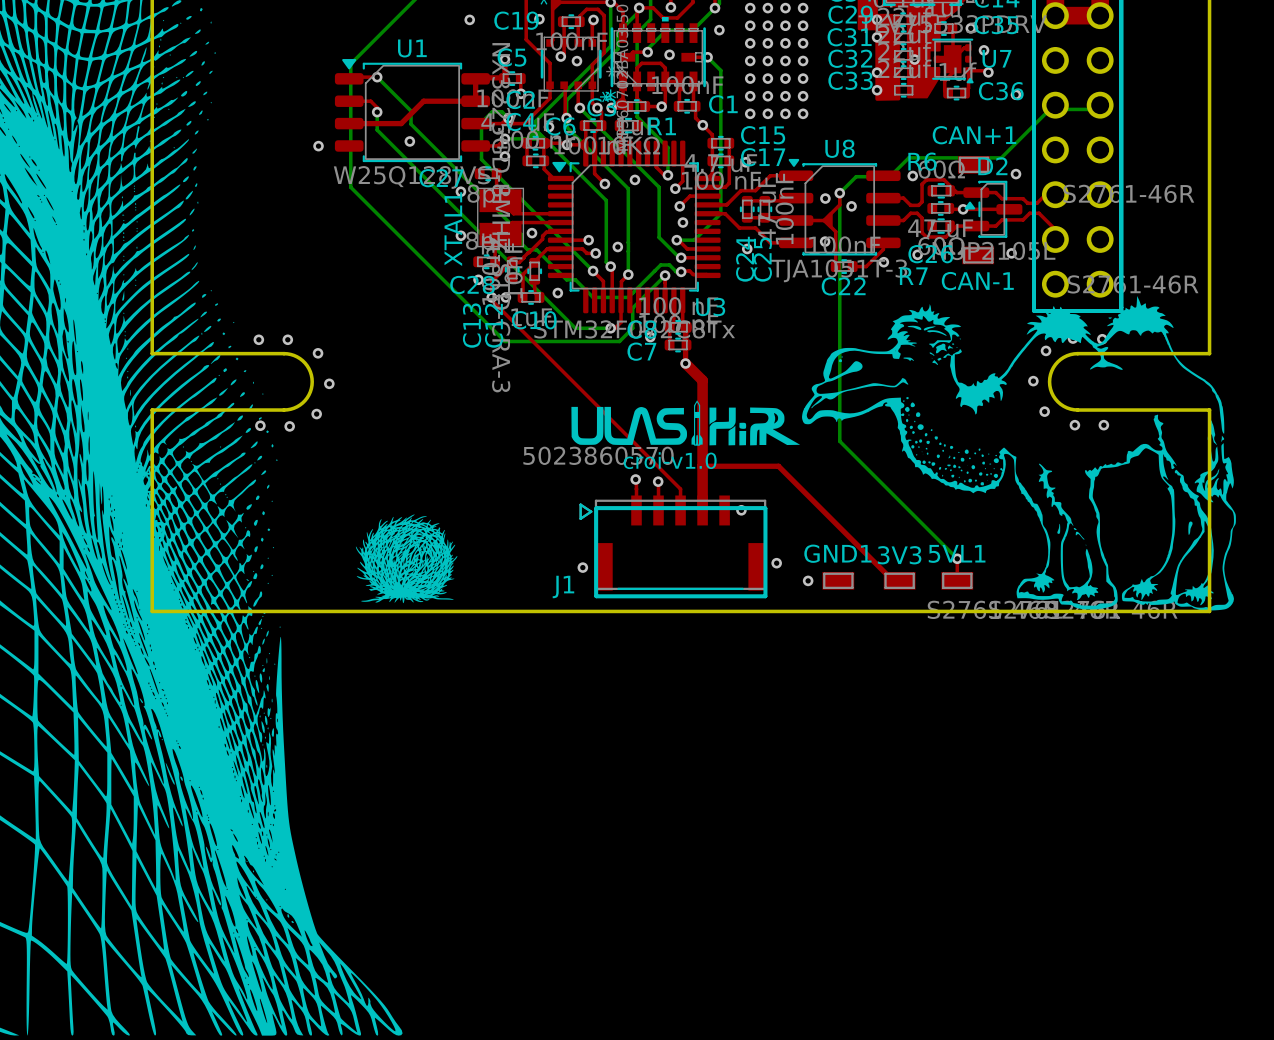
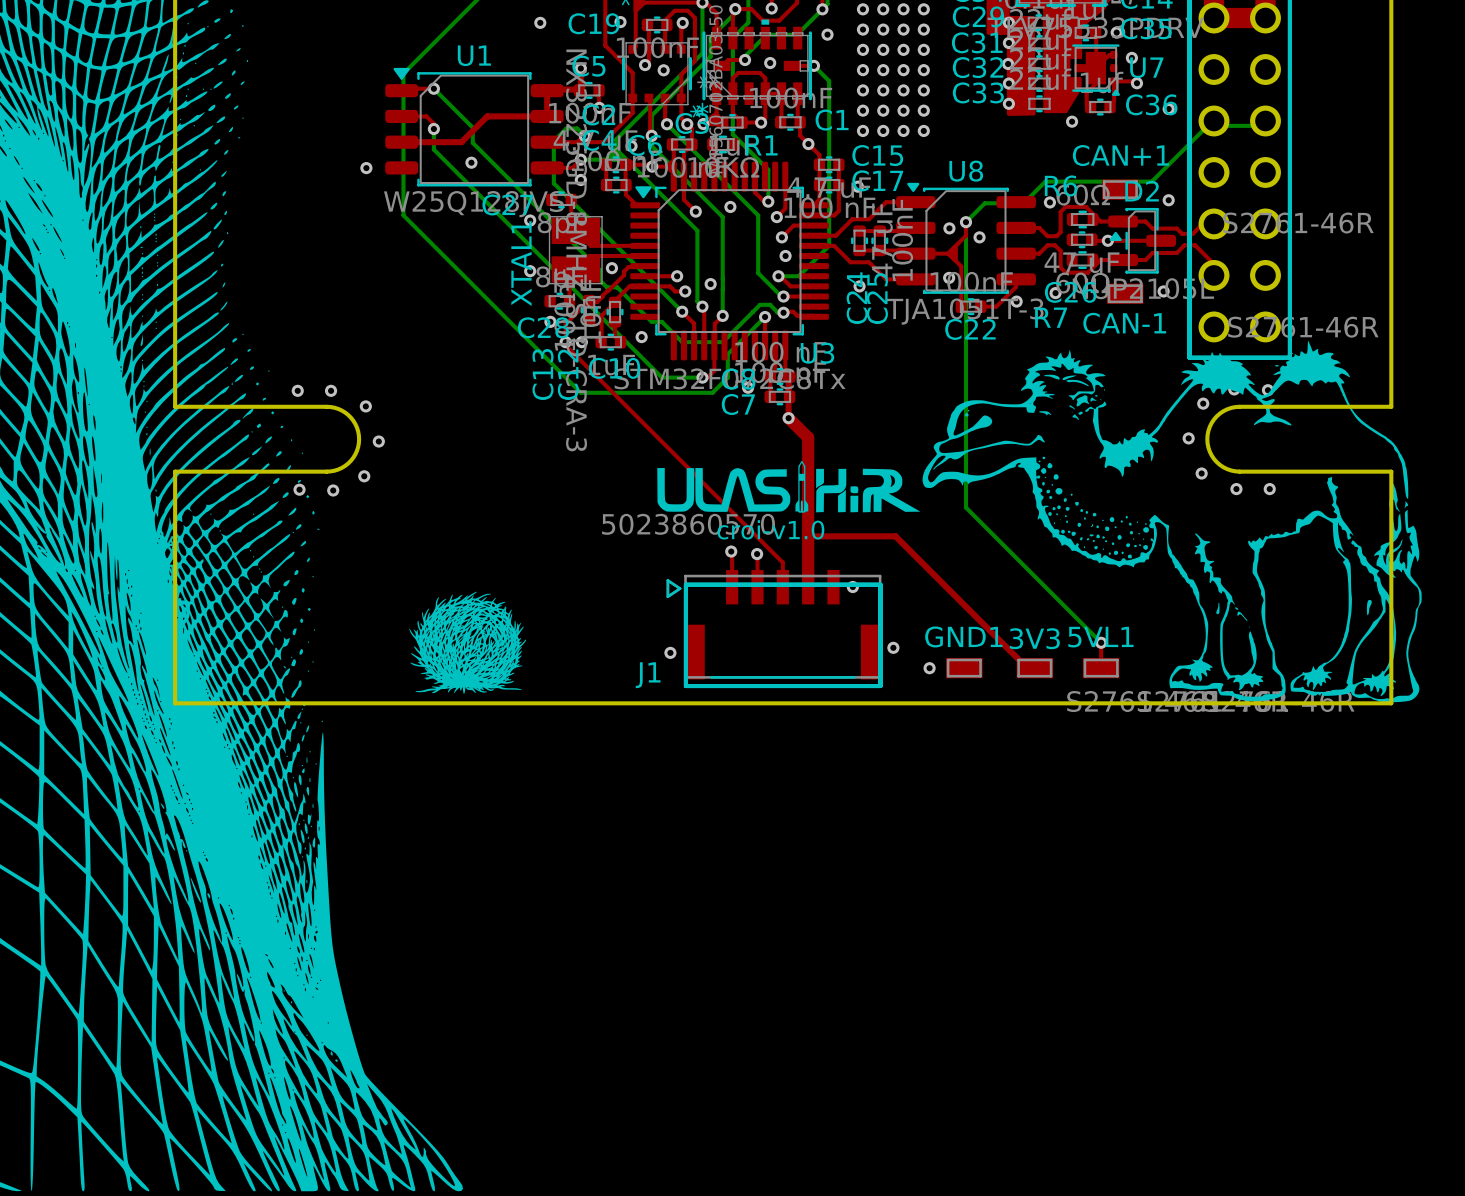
via: none -> (1008, 64)
via: (914, 59) -> none
via: none -> (1072, 121)

